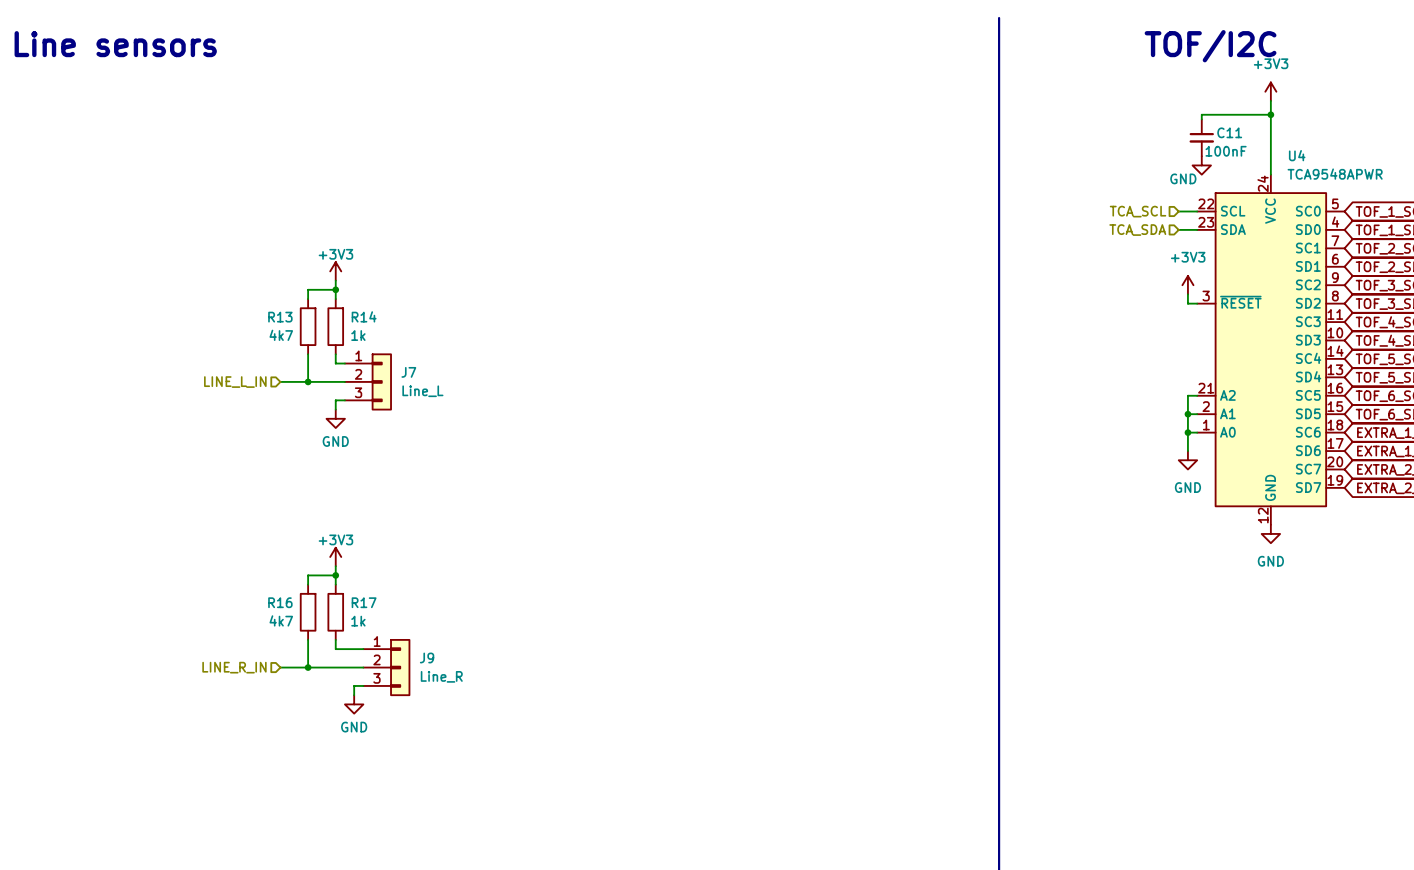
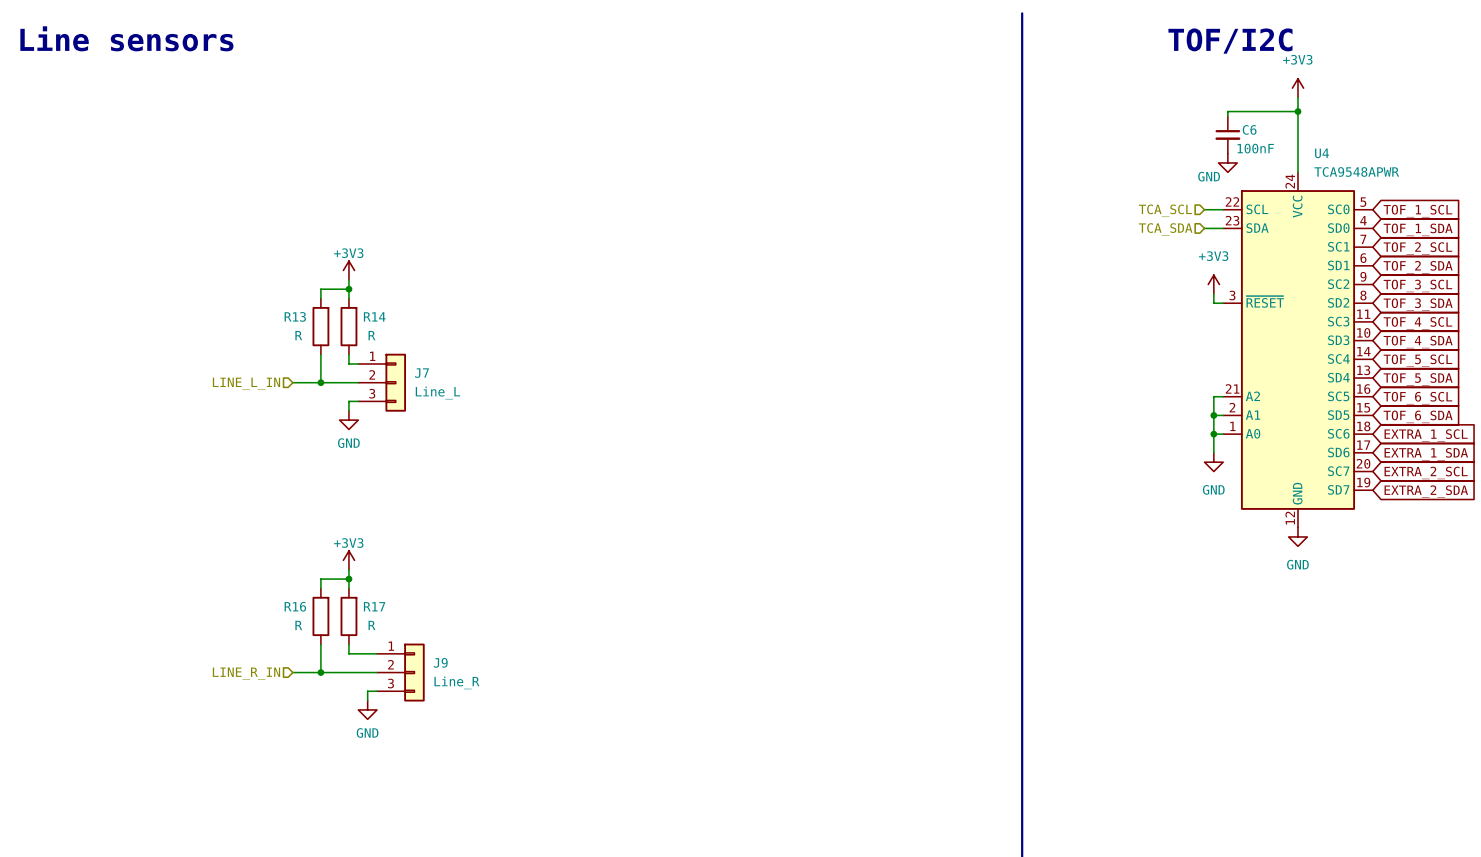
C11 name: C11 (1229, 132) -> C6 (1249, 129)
R13 value: 4k7 (281, 335) -> R (298, 335)
R14 value: 1k (358, 335) -> R (371, 335)
R16 value: 4k7 (281, 620) -> R (298, 625)
R17 value: 1k (358, 621) -> R (371, 625)

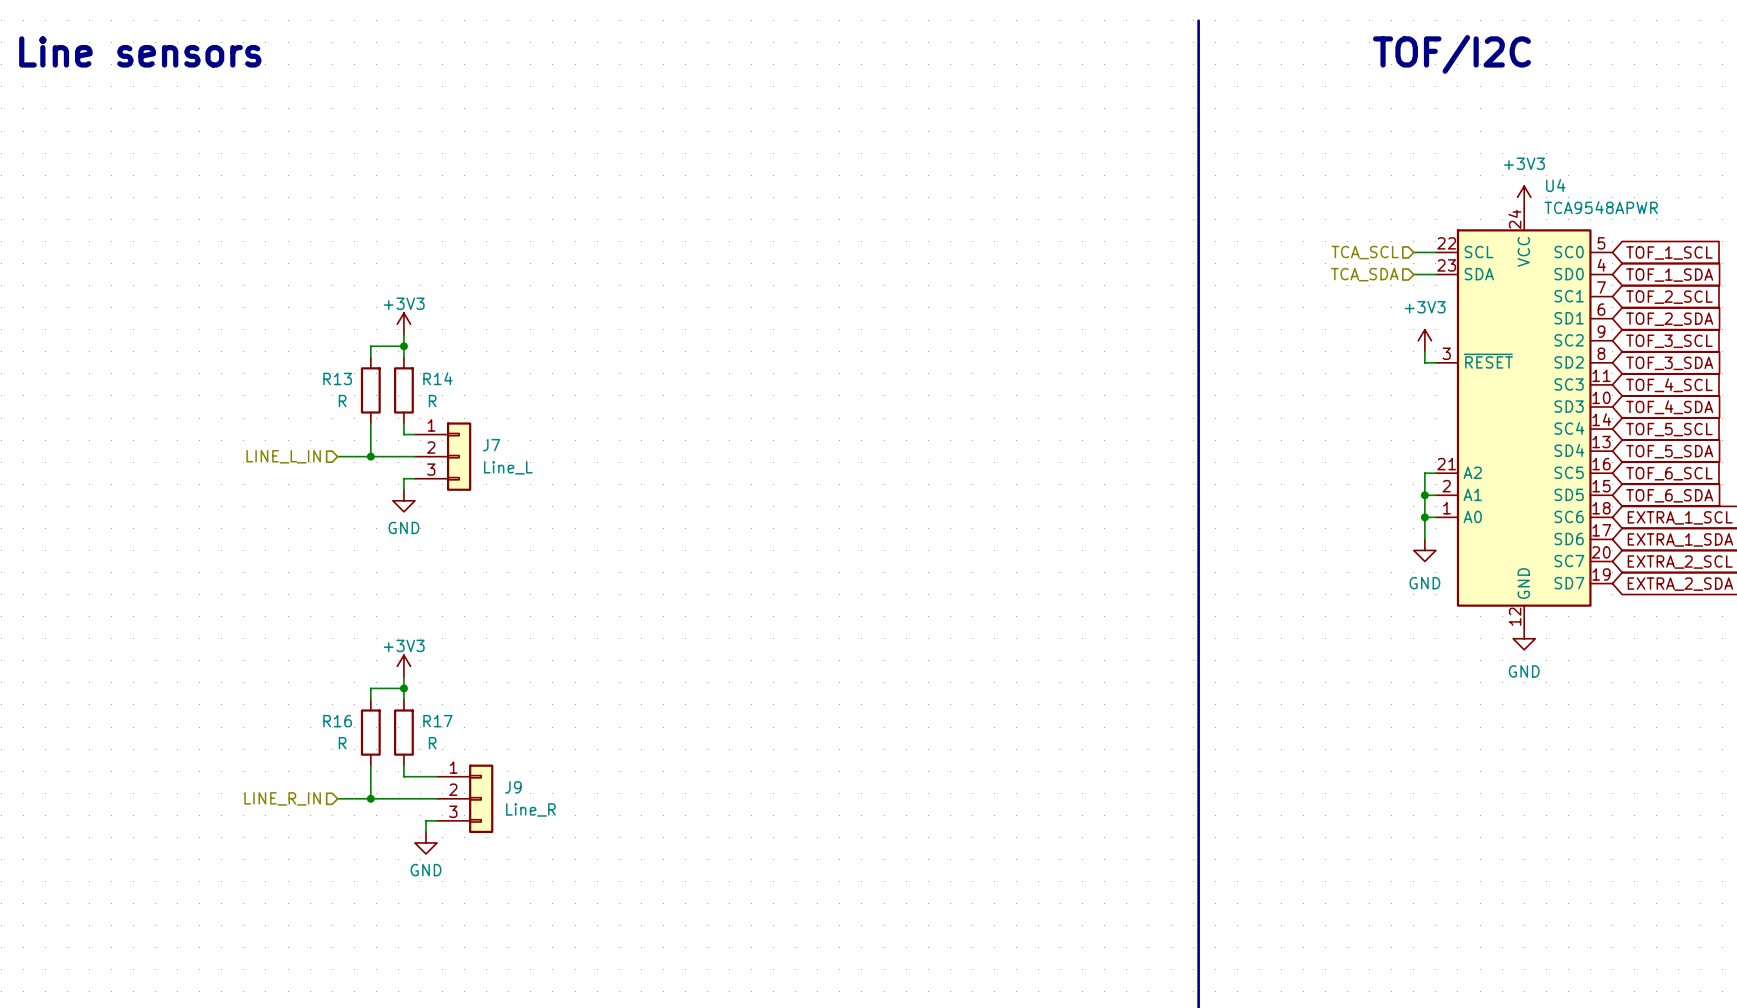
power symbol position: +3V3 (1298, 88) -> +3V3 (1524, 197)
wire: (1298, 97) (1298, 172) -> none
wire: (1298, 111) (1227, 111) (1227, 116) -> none
junction: (1298, 111) -> none
C6: 100nF (1227, 134) -> none
power symbol: GND (1227, 162) -> none

